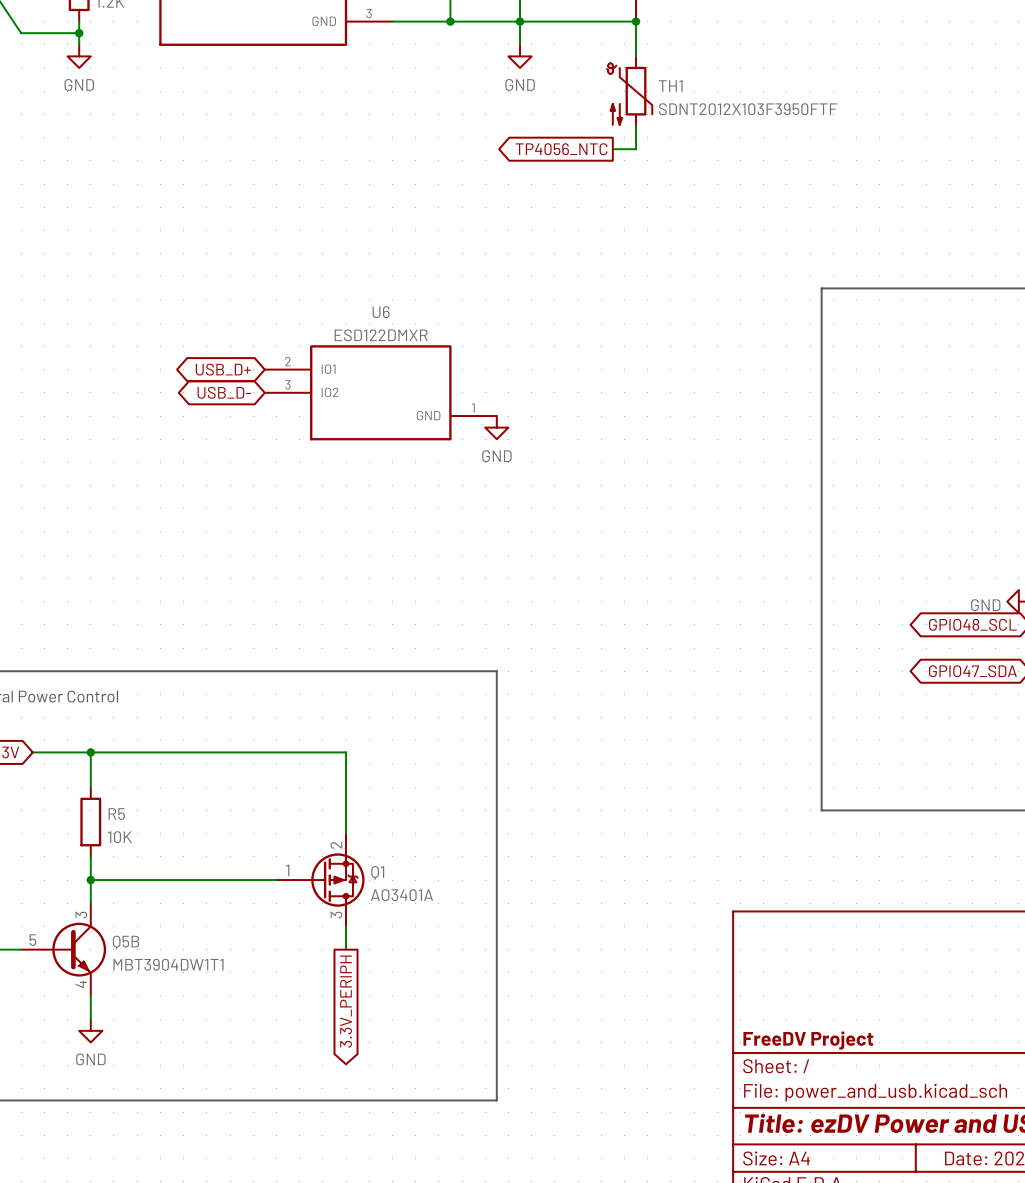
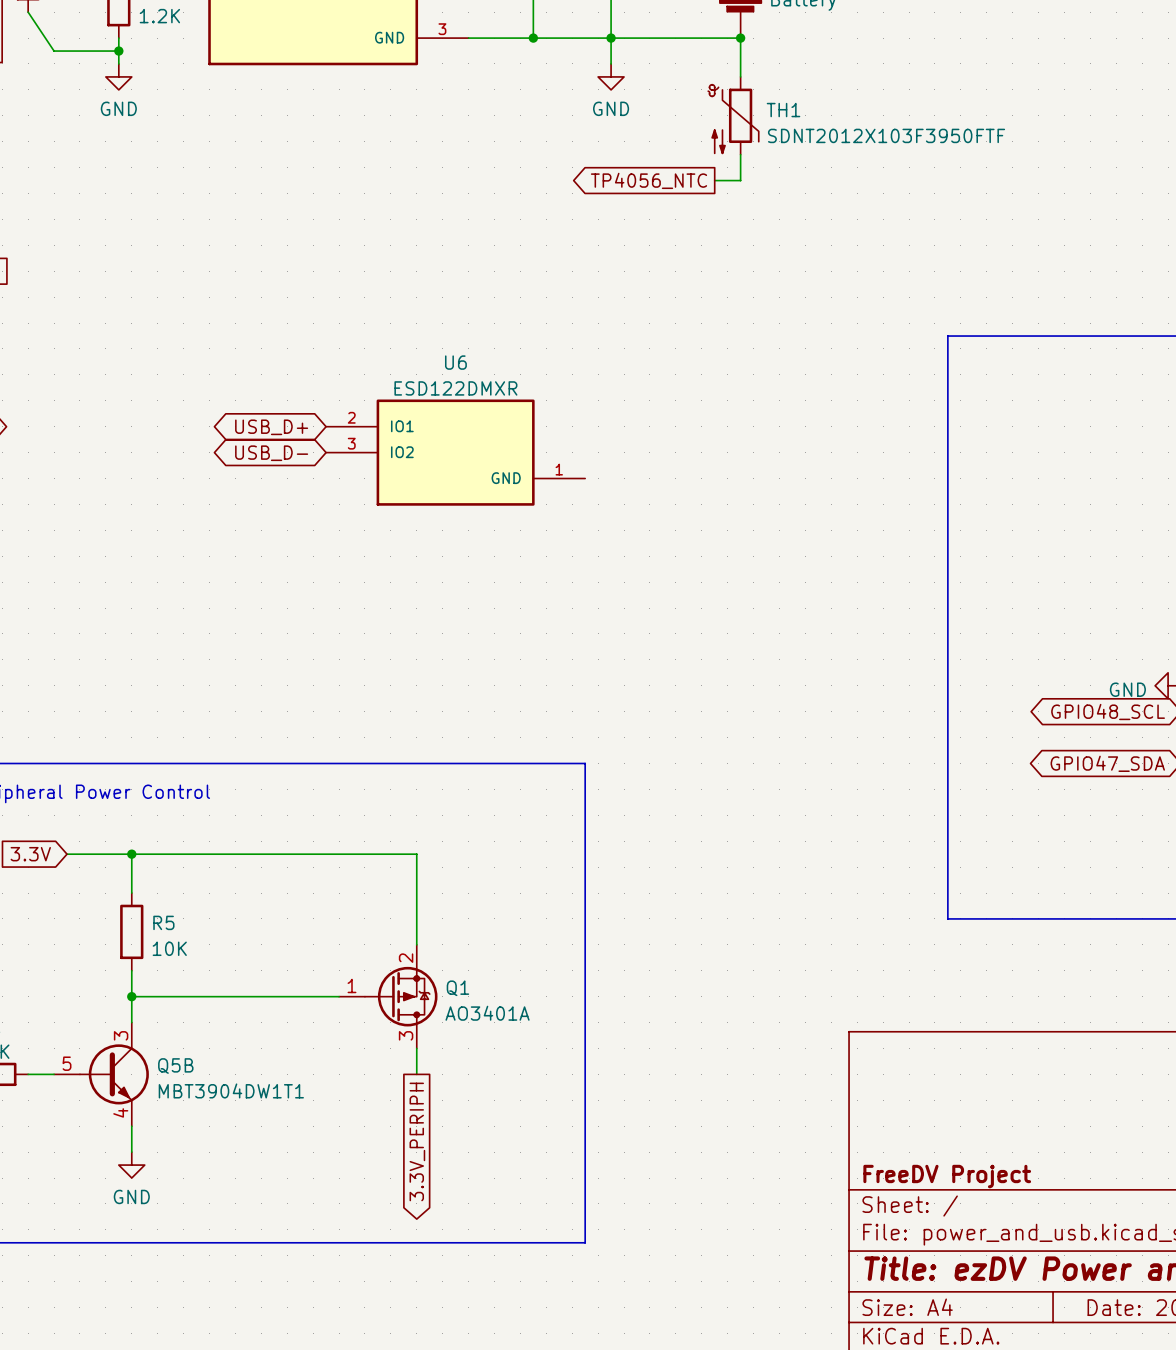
power symbol: GND (496, 427) -> none

